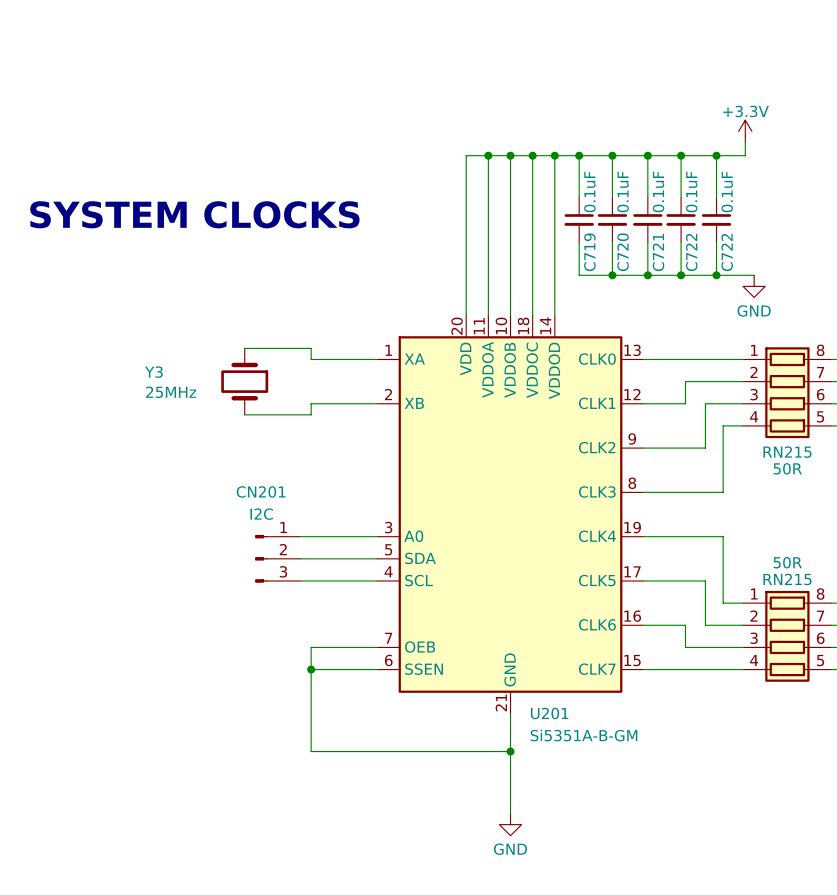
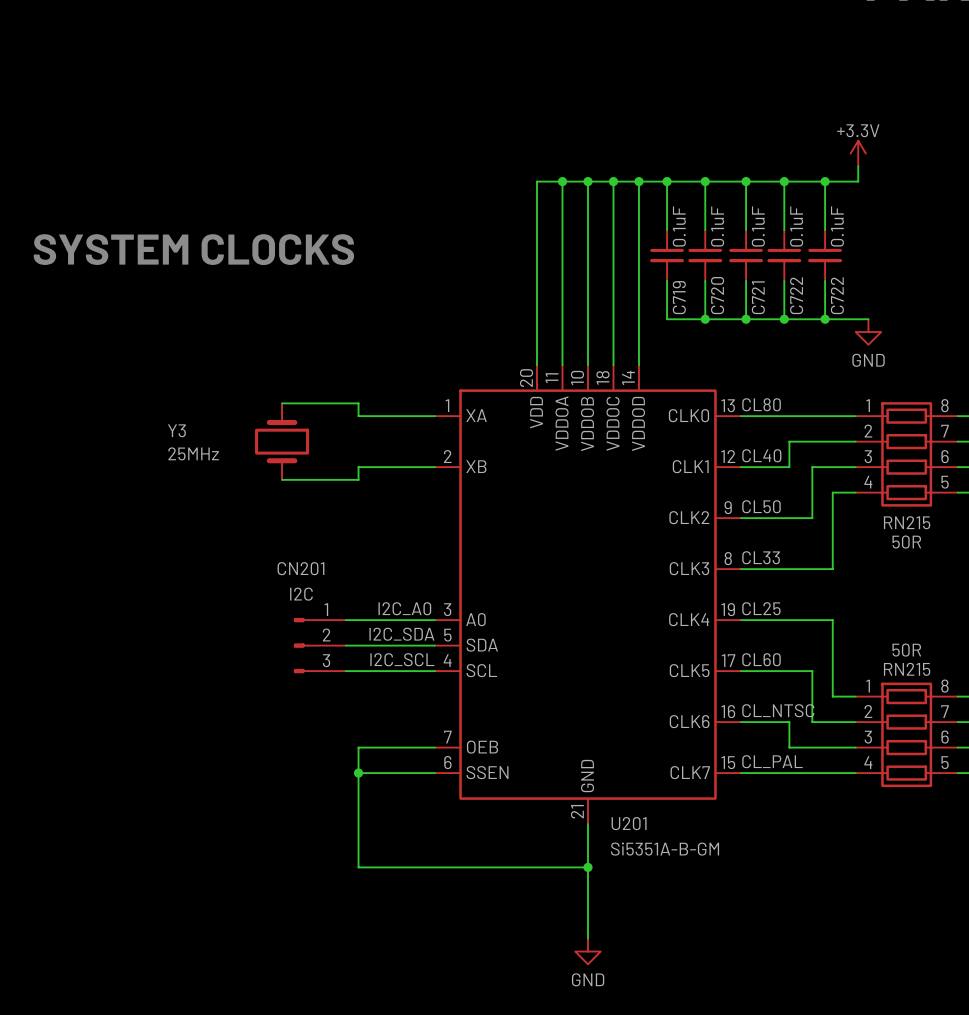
label: none -> CL80 (761, 404)
label: none -> CL40 (761, 455)
label: none -> CL50 (761, 506)
label: none -> CL33 (761, 557)
label: none -> CL25 (761, 608)
label: none -> I2C_A0 (404, 608)
label: none -> I2C_SDA (401, 634)
label: none -> CL60 (761, 659)
label: none -> I2C_SCL (402, 659)
label: none -> CL_NTSC (778, 710)
label: none -> CL_PAL (772, 761)

